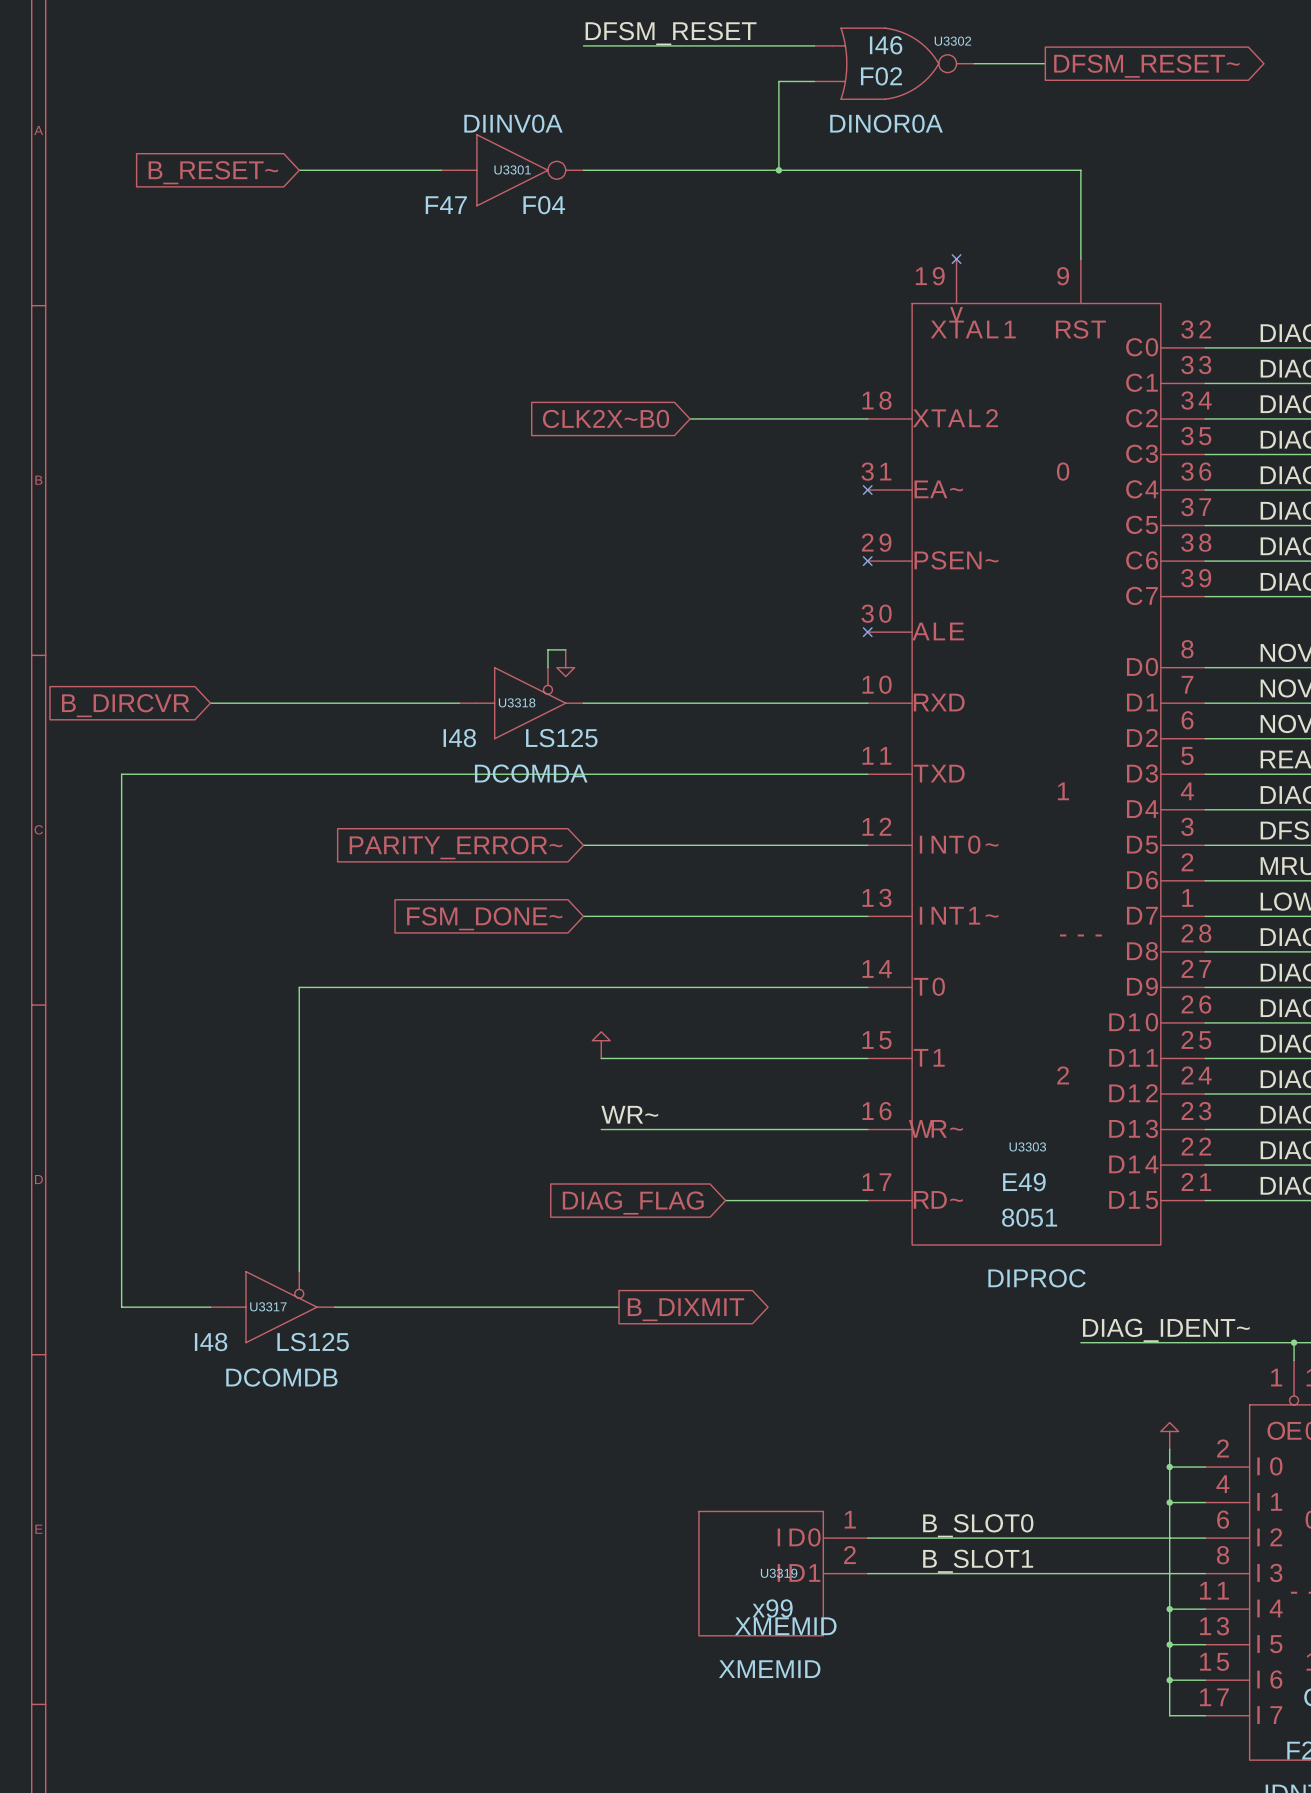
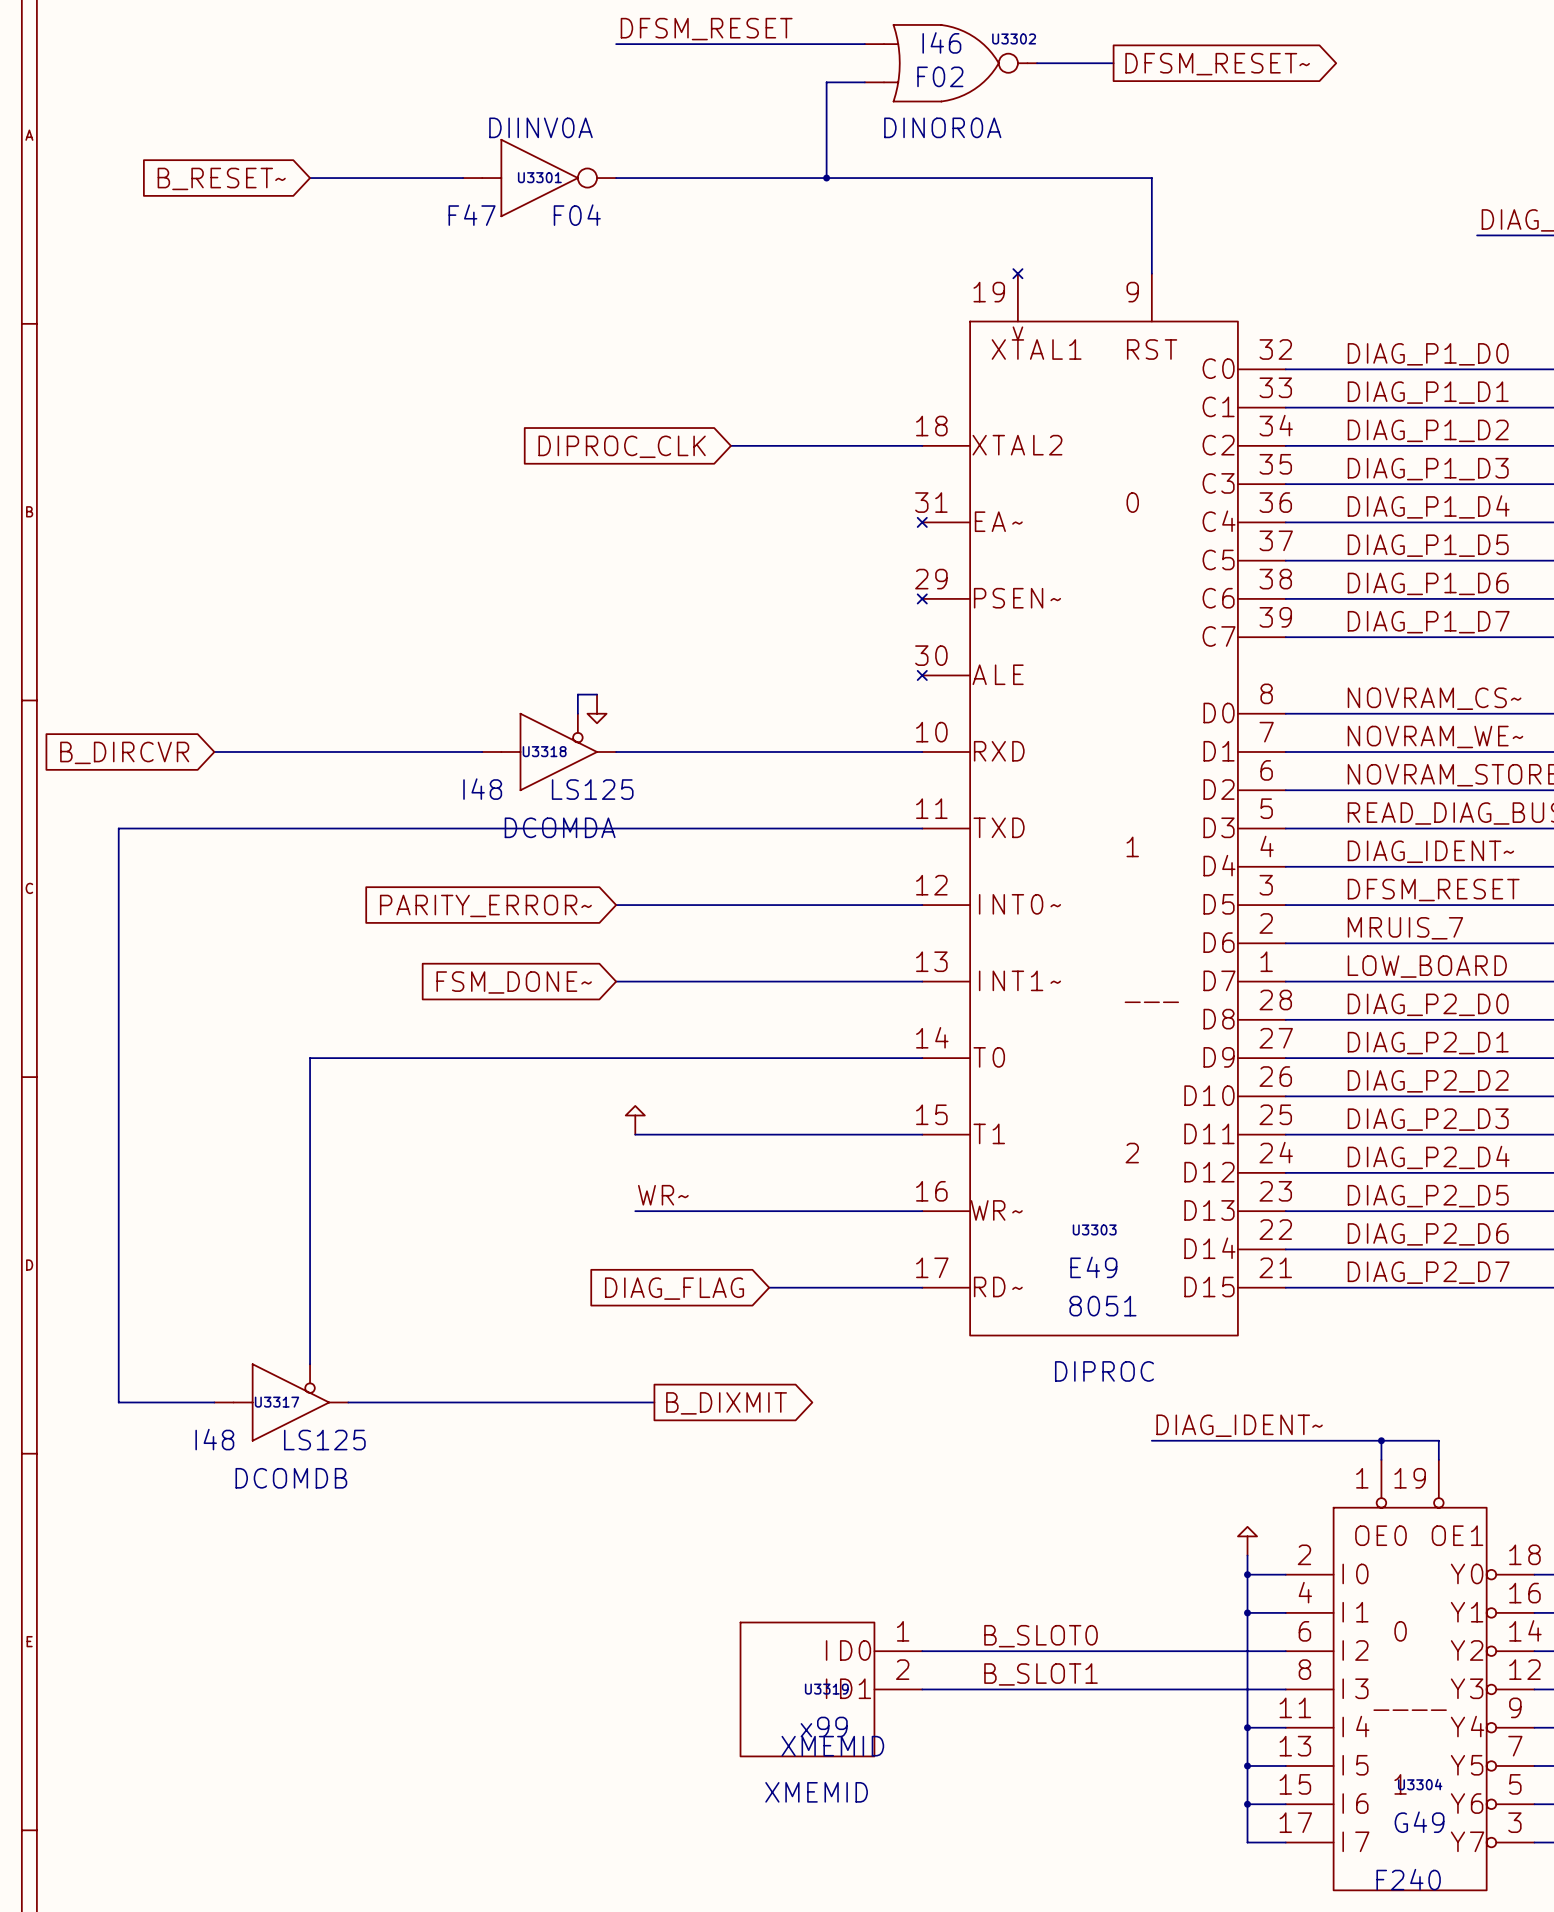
global label: CLK2X~B0 (606, 418) -> DIPROC_CLK (622, 446)

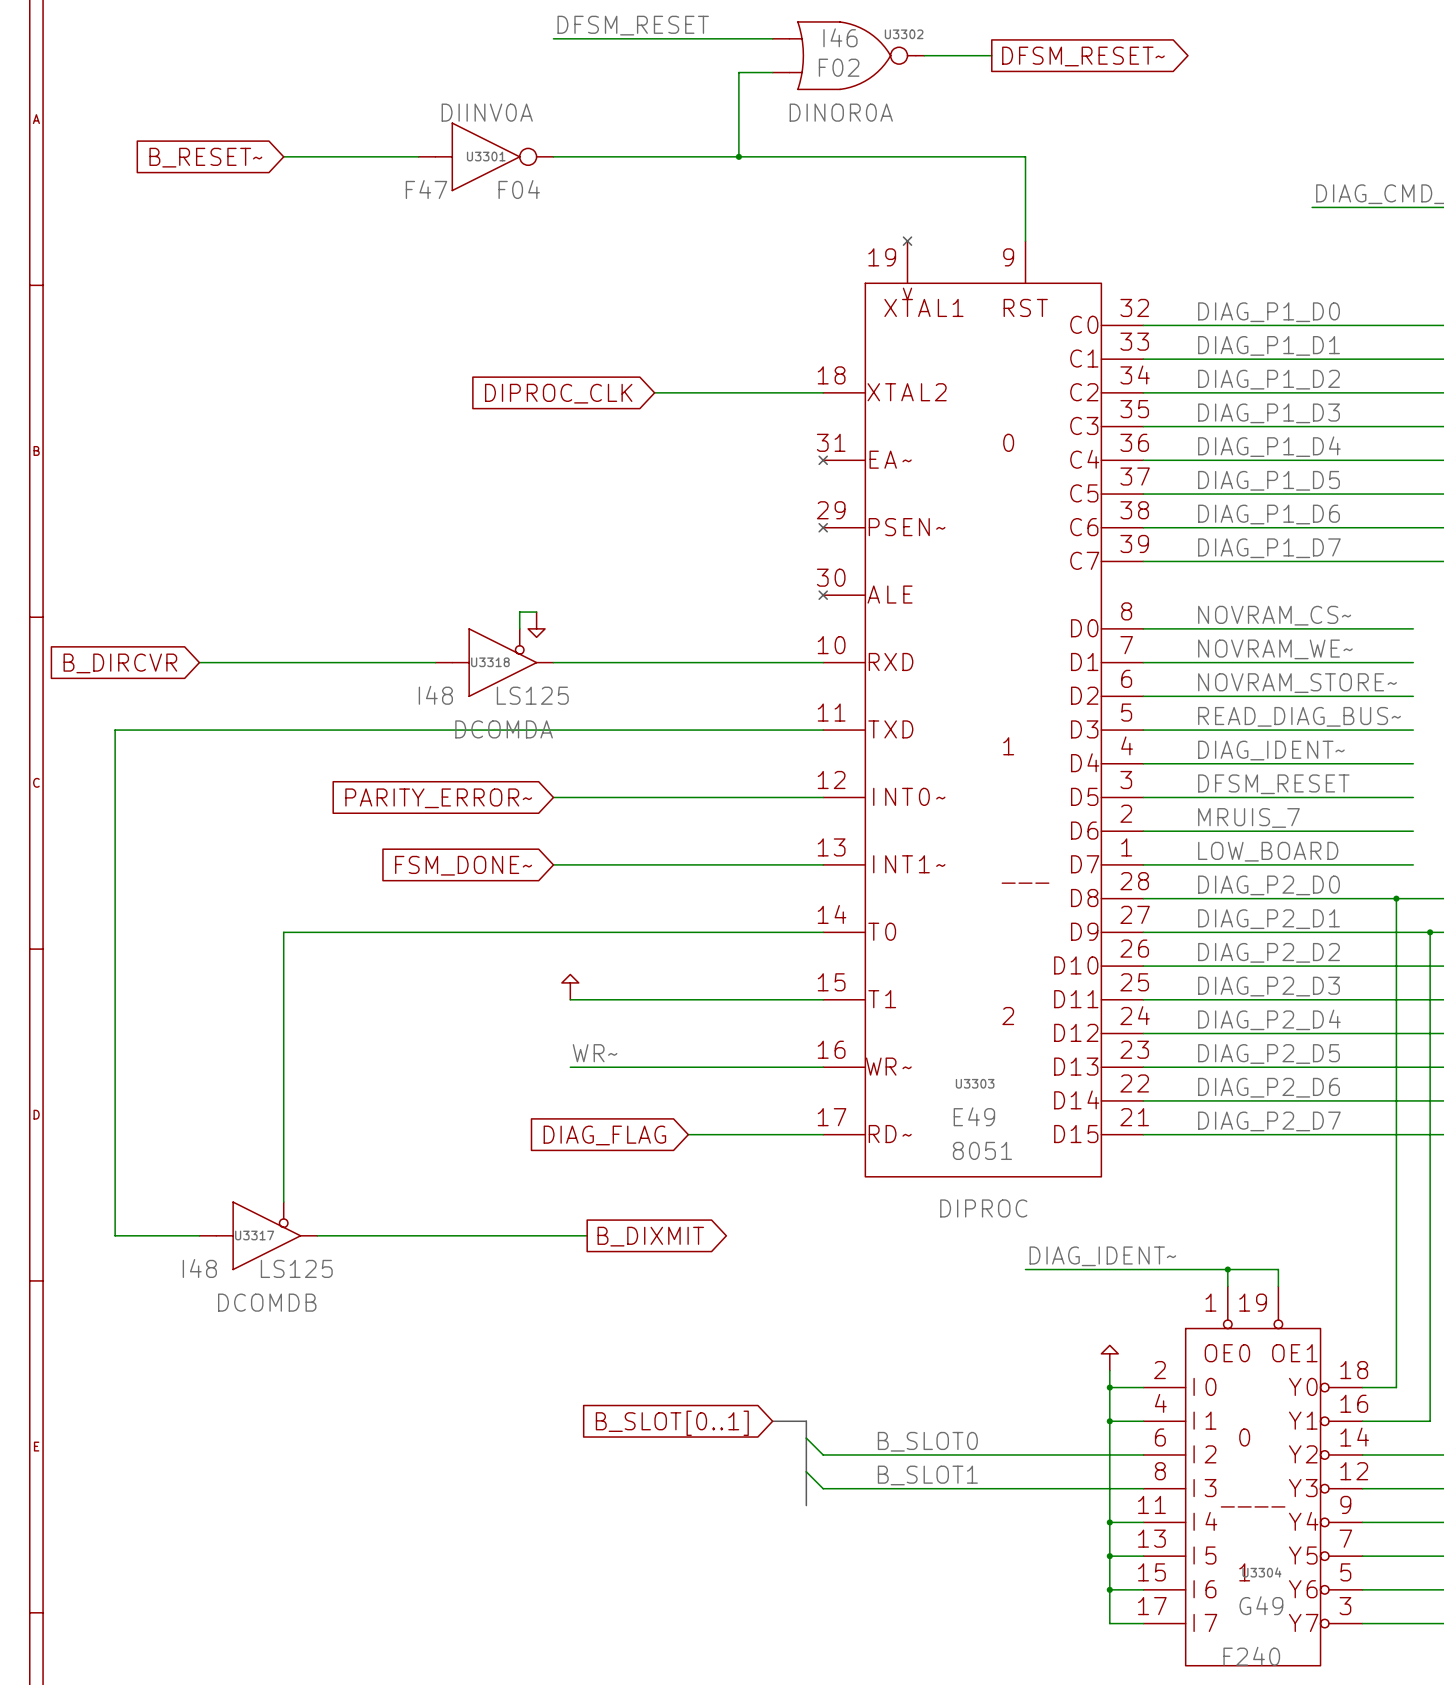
bus: none -> (772, 1421) (806, 1421) (806, 1505)
global label: none -> B_SLOT[0..1] (672, 1423)
wire: none -> (806, 1438) (823, 1454)
wire: none -> (806, 1471) (823, 1488)
U3319: XMEMID (831, 1689) -> none

